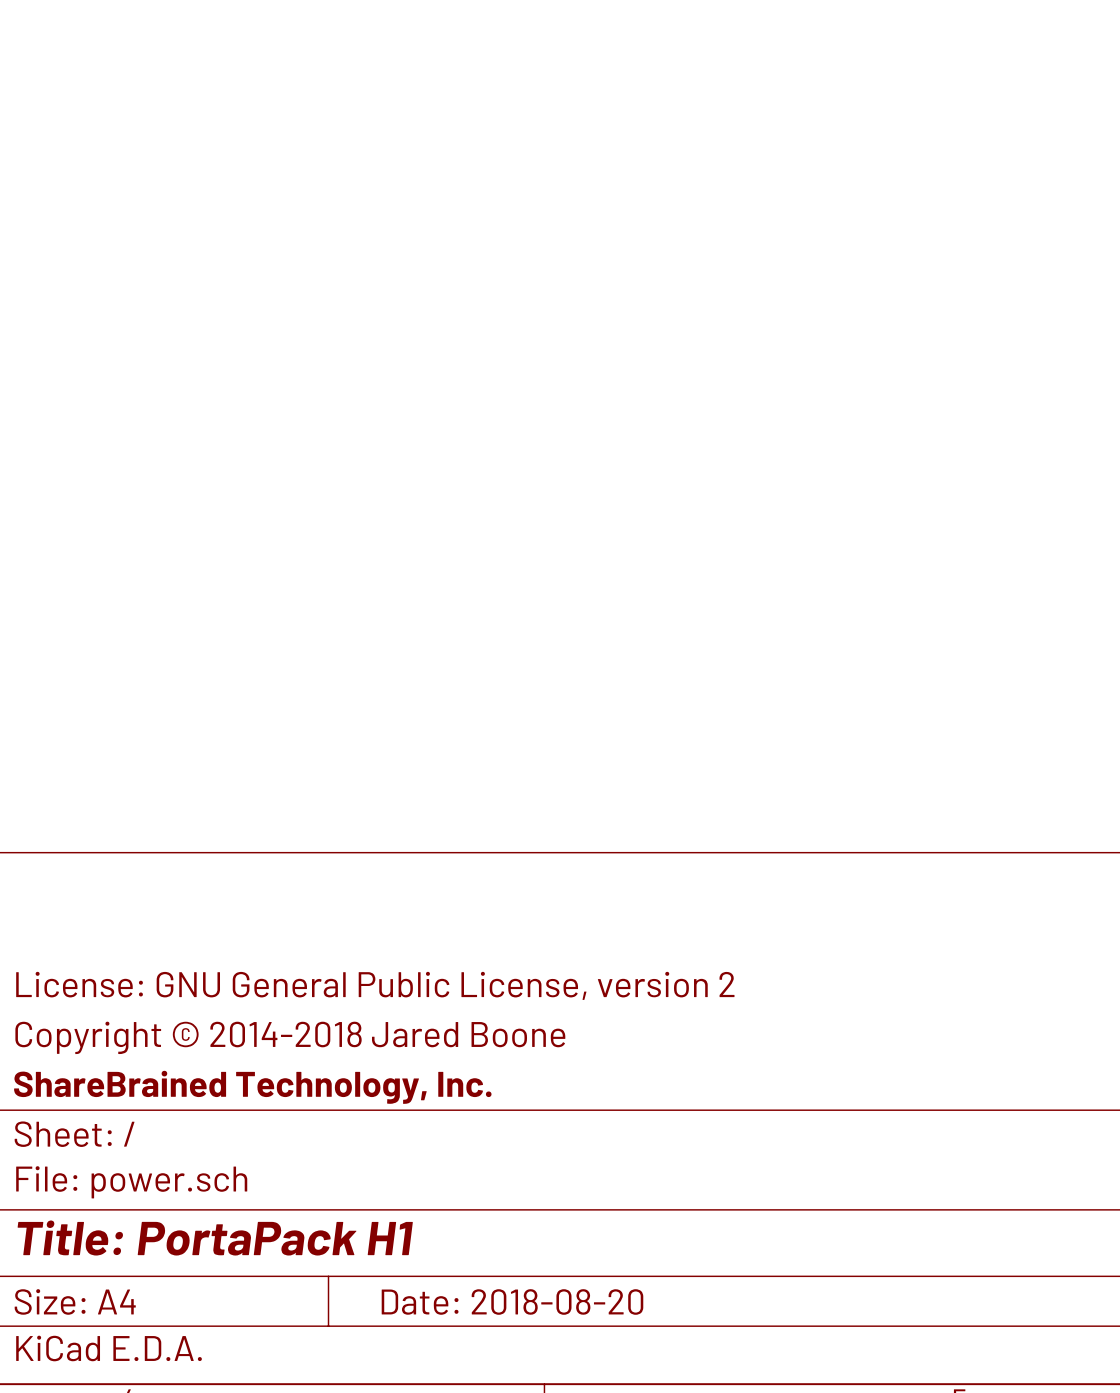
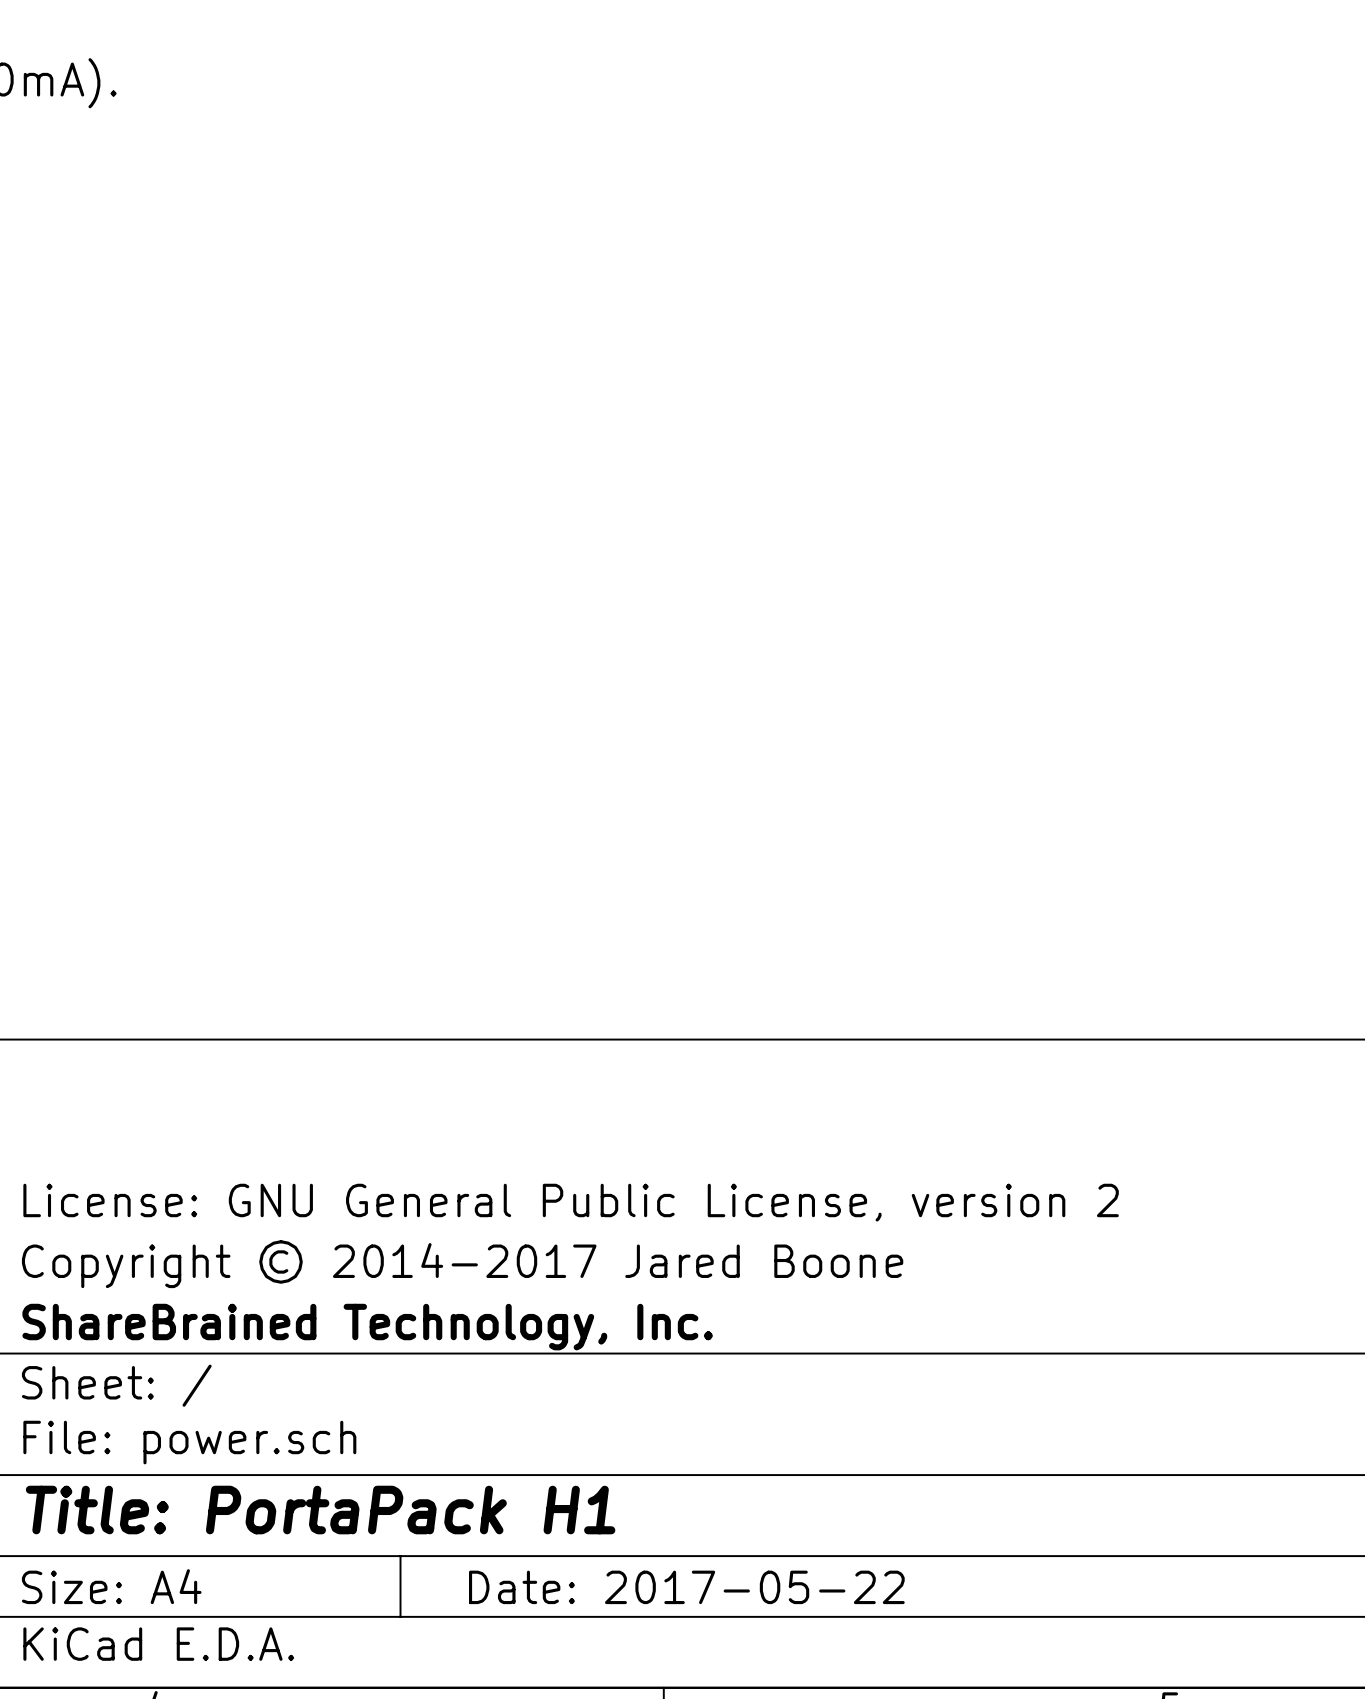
title block: Copyright © 2014-2018 Jared Boone (290, 1037) -> Copyright © 2014-2017 Jared Boone (462, 1264)
title block: Date: 2018-08-20 (512, 1301) -> Date: 2017-05-22 (686, 1587)

